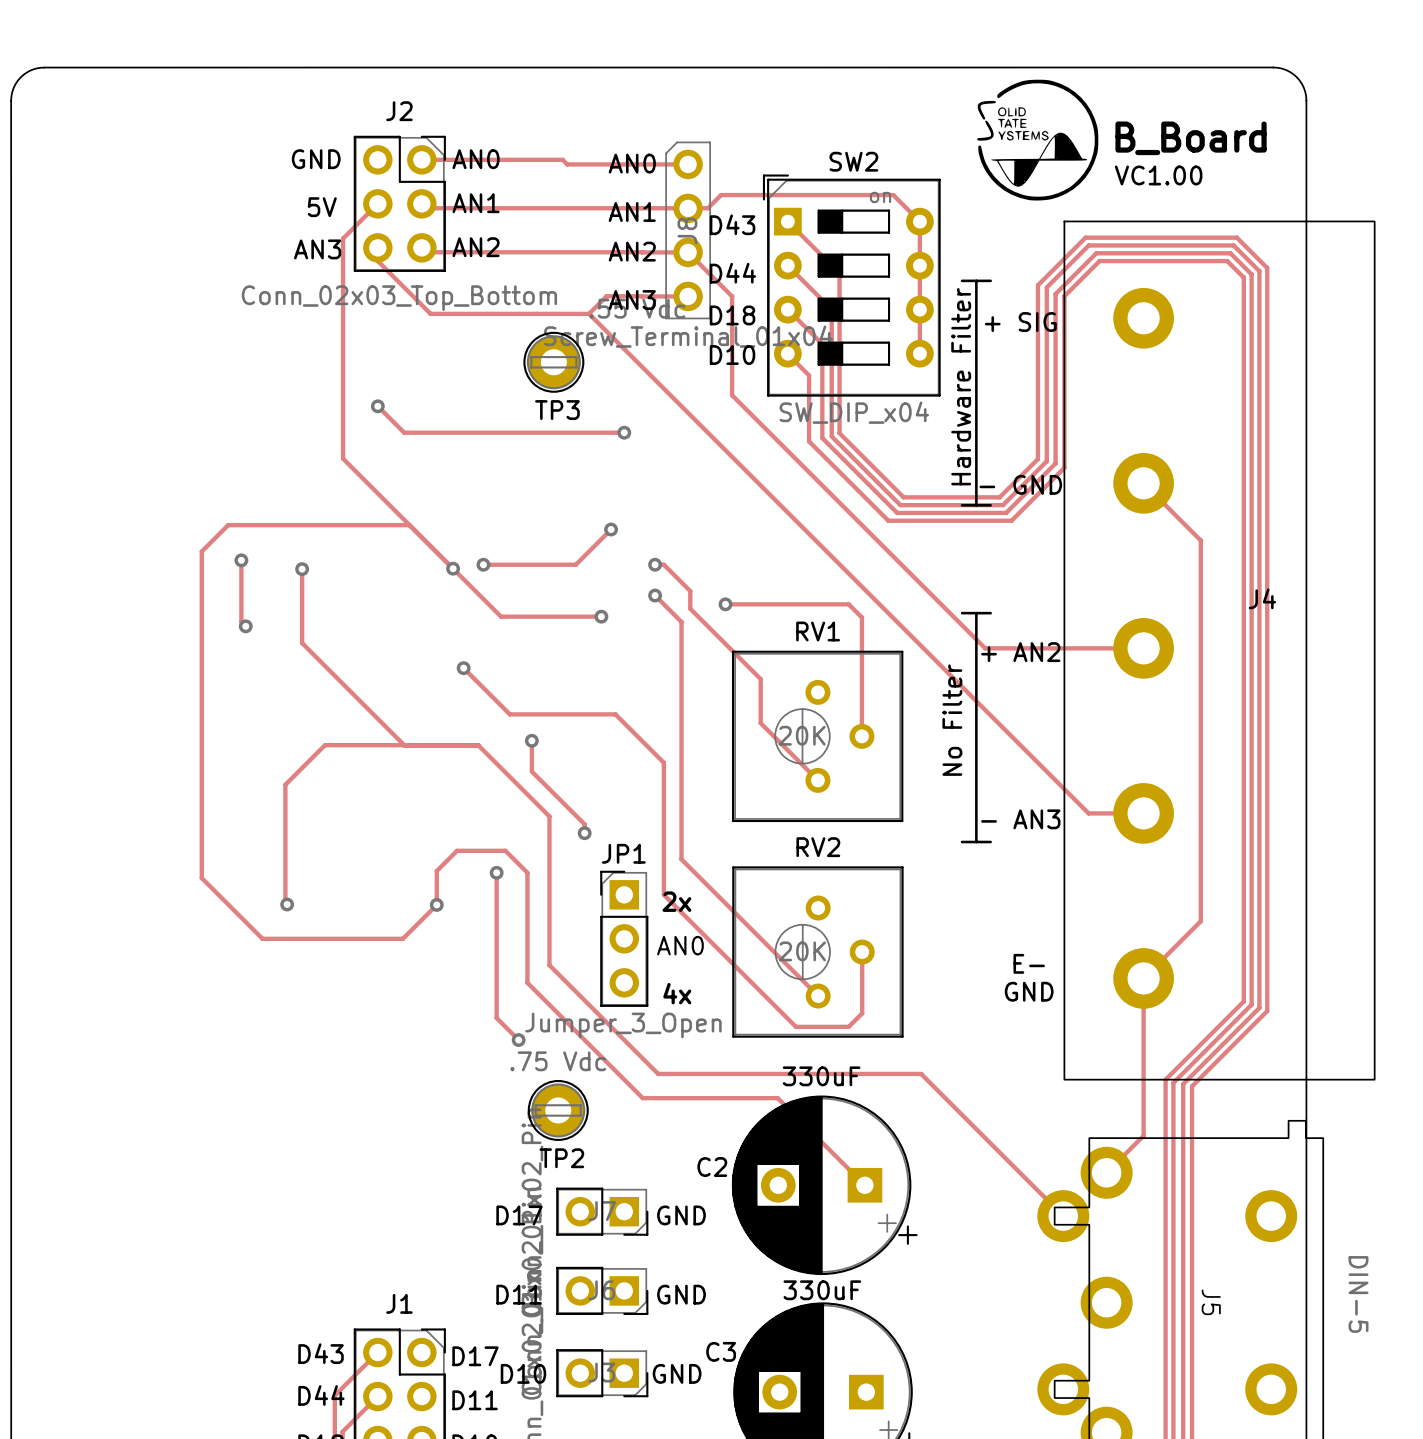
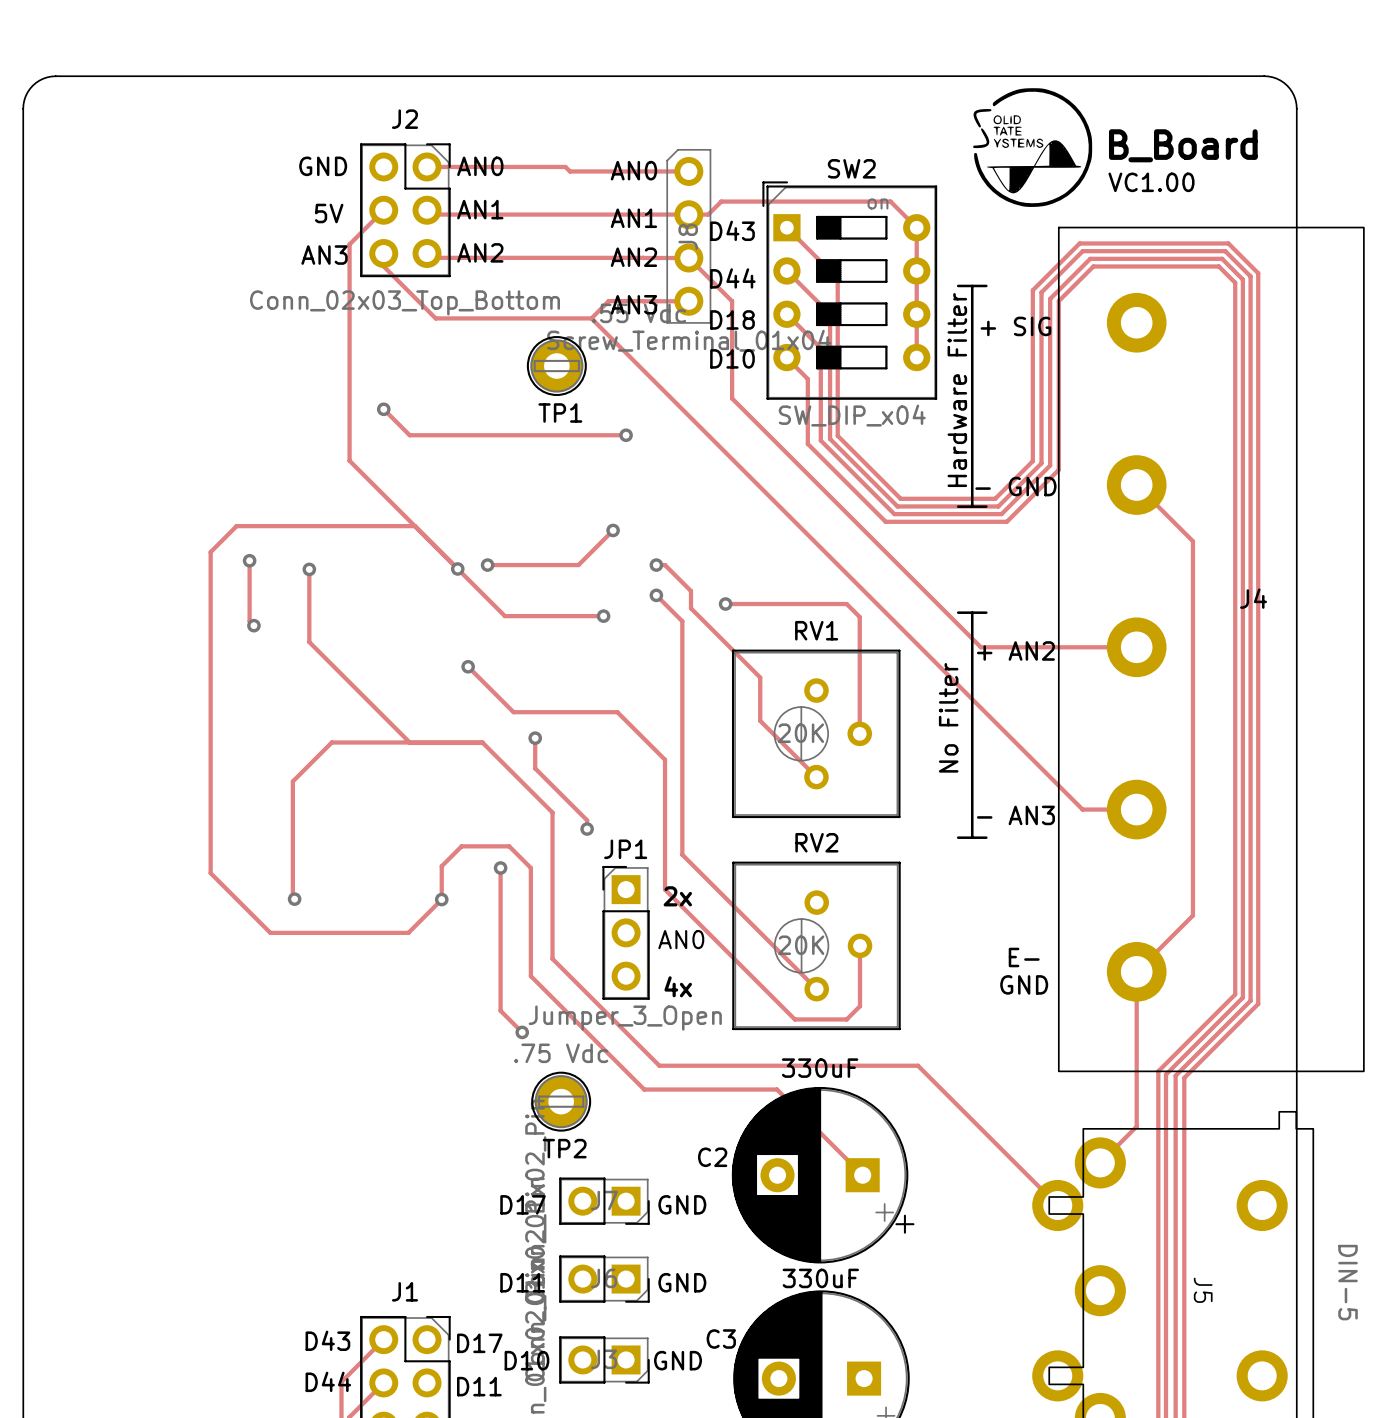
TP3 name: TP3 (557, 410) -> TP1 (560, 412)

